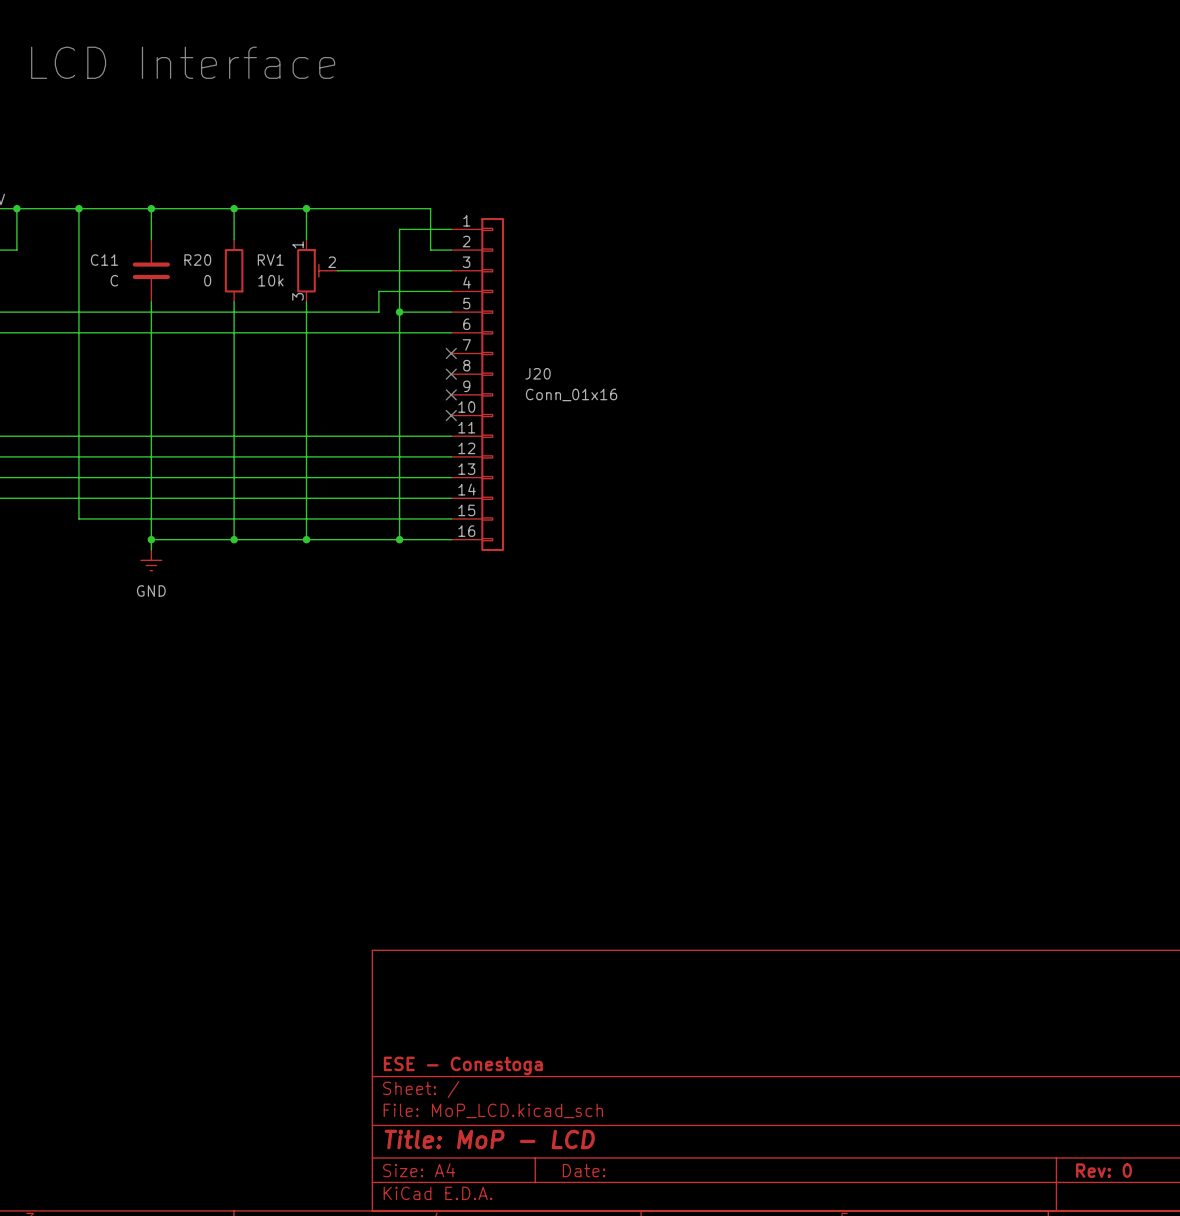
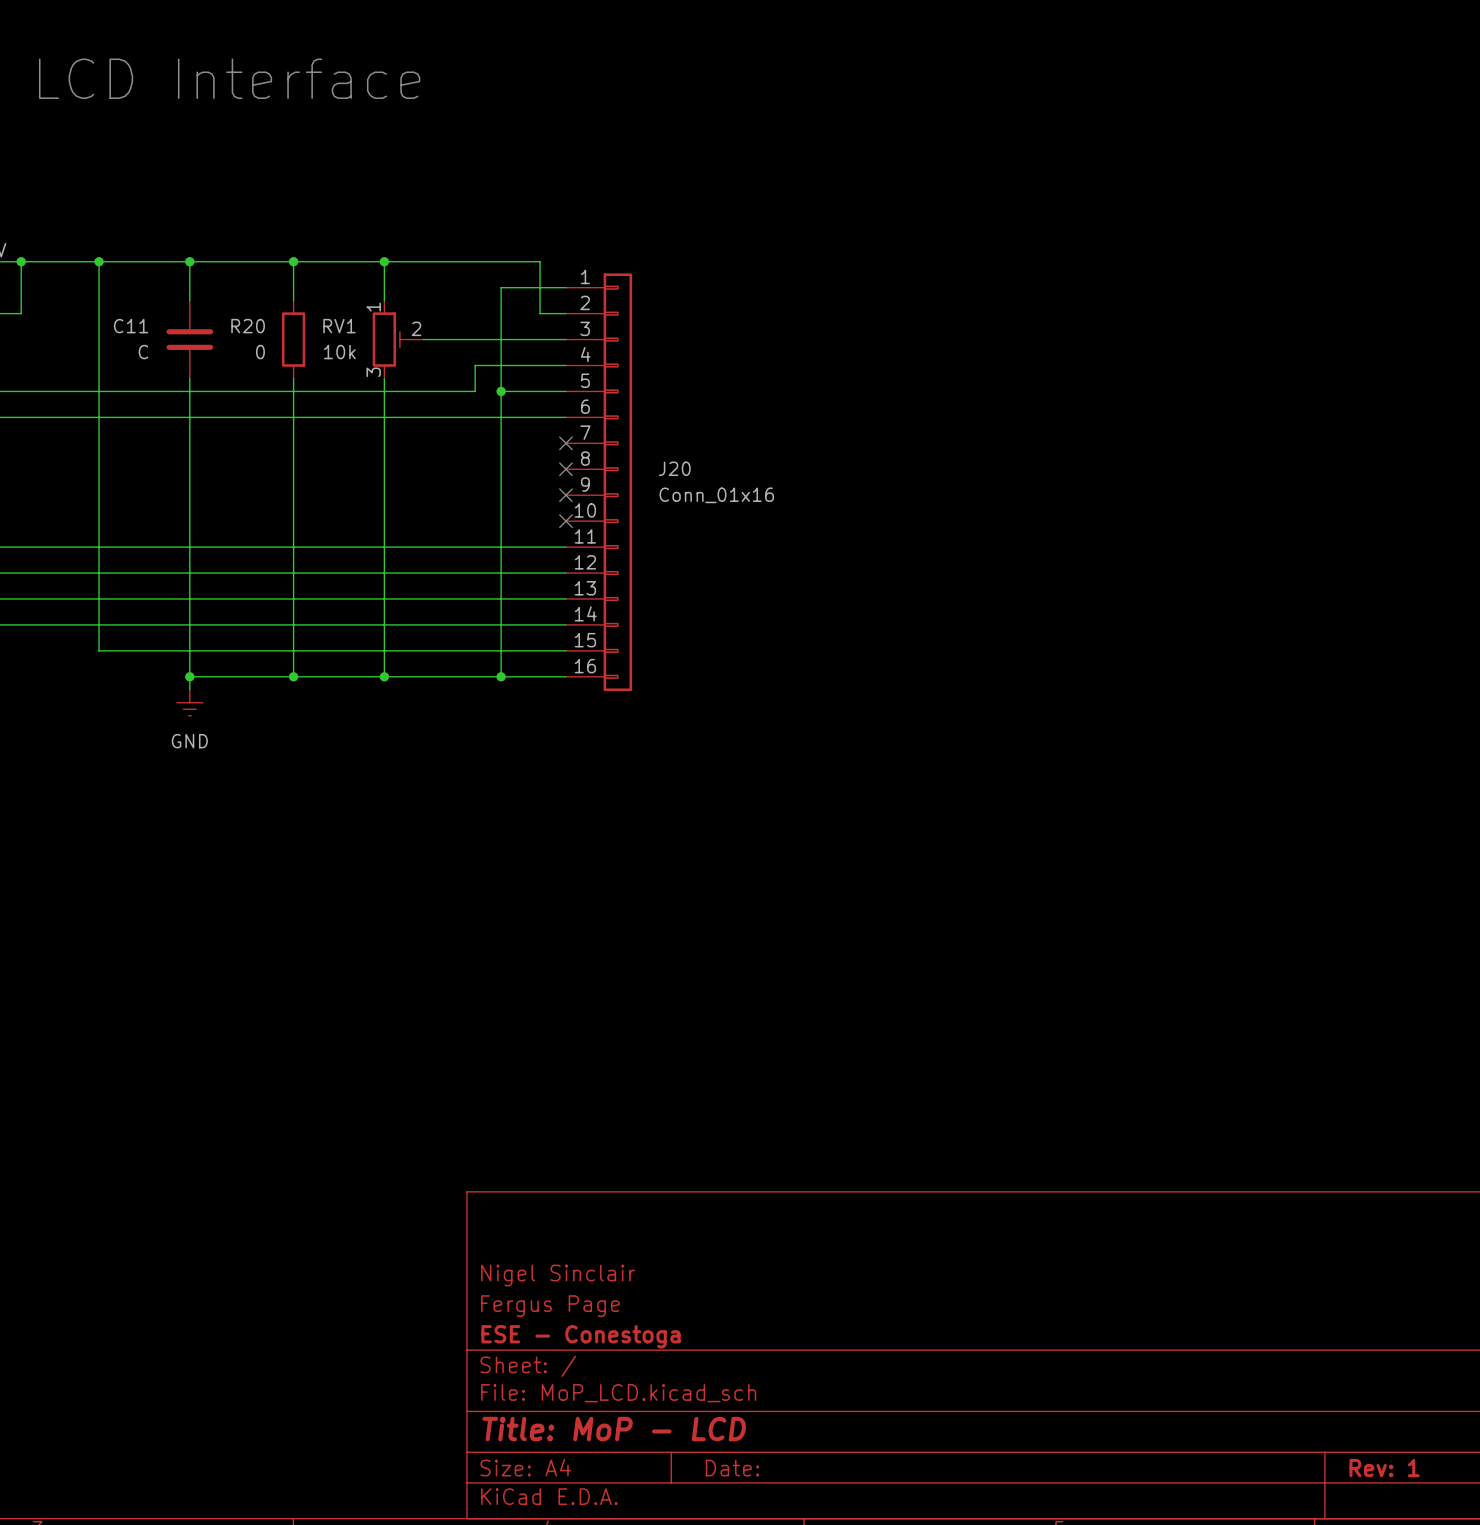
title block: none -> Nigel Sinclair (558, 1275)
title block: none -> Fergus Page (550, 1306)
title block: Rev: 0 (1104, 1170) -> Rev: 1 (1384, 1468)

